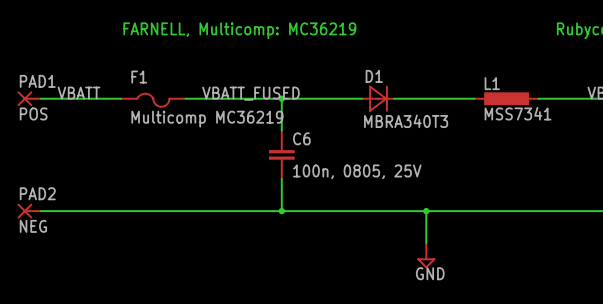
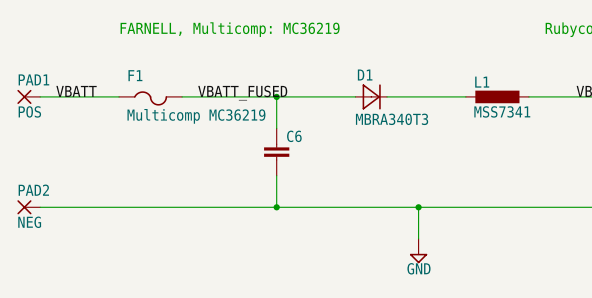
C6 value: 100n, 0805, 25V (357, 171) -> none

